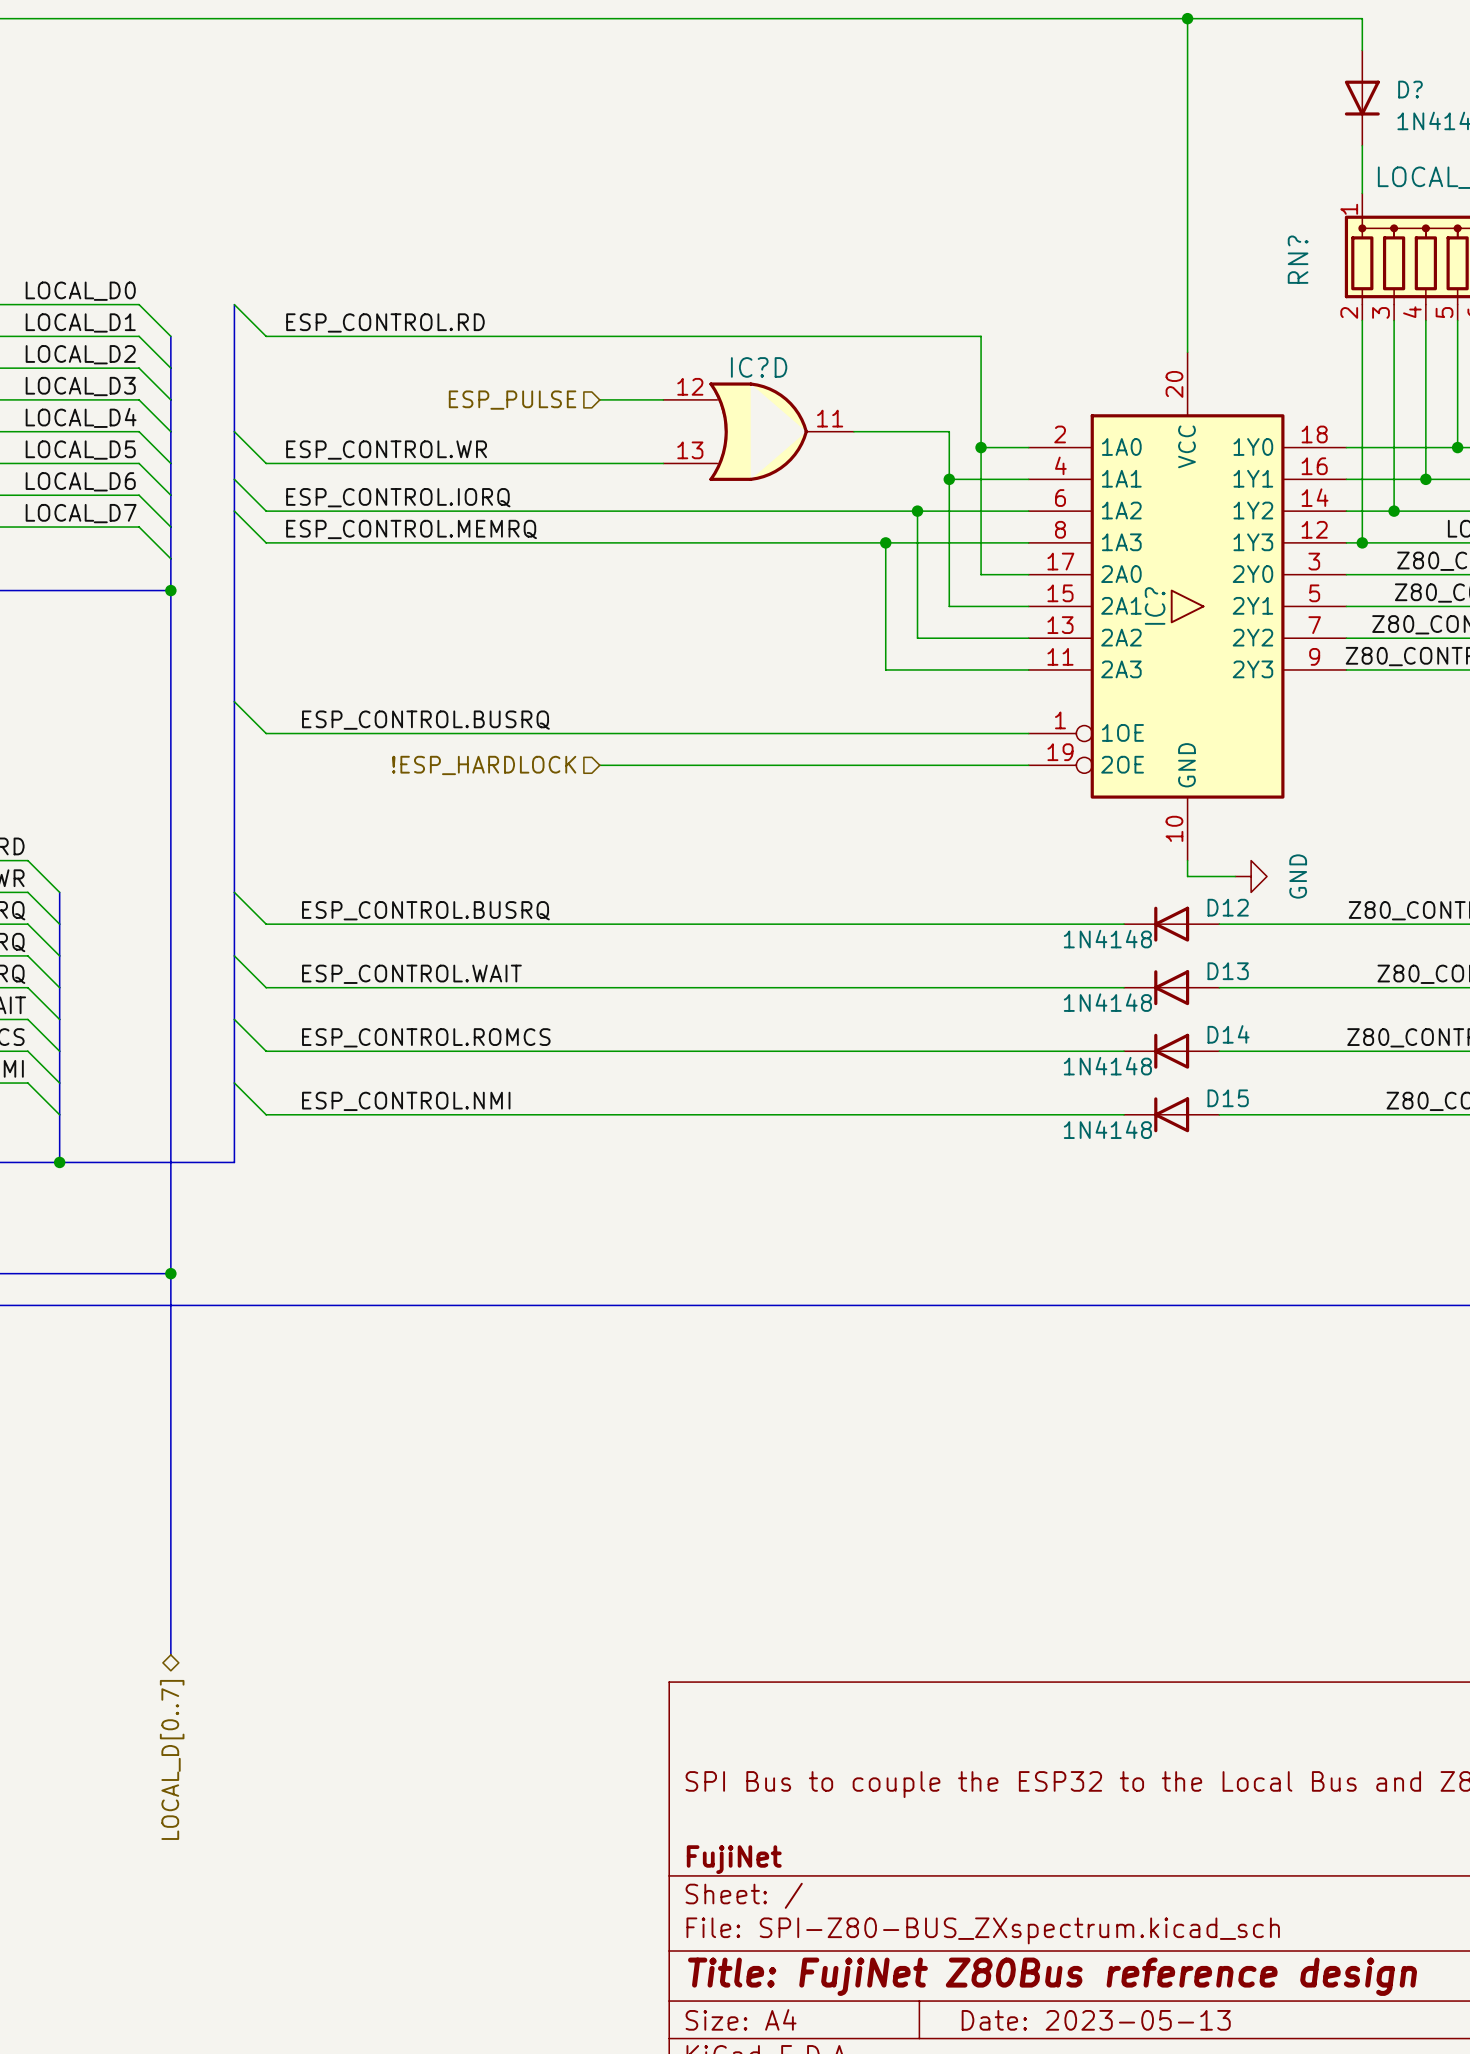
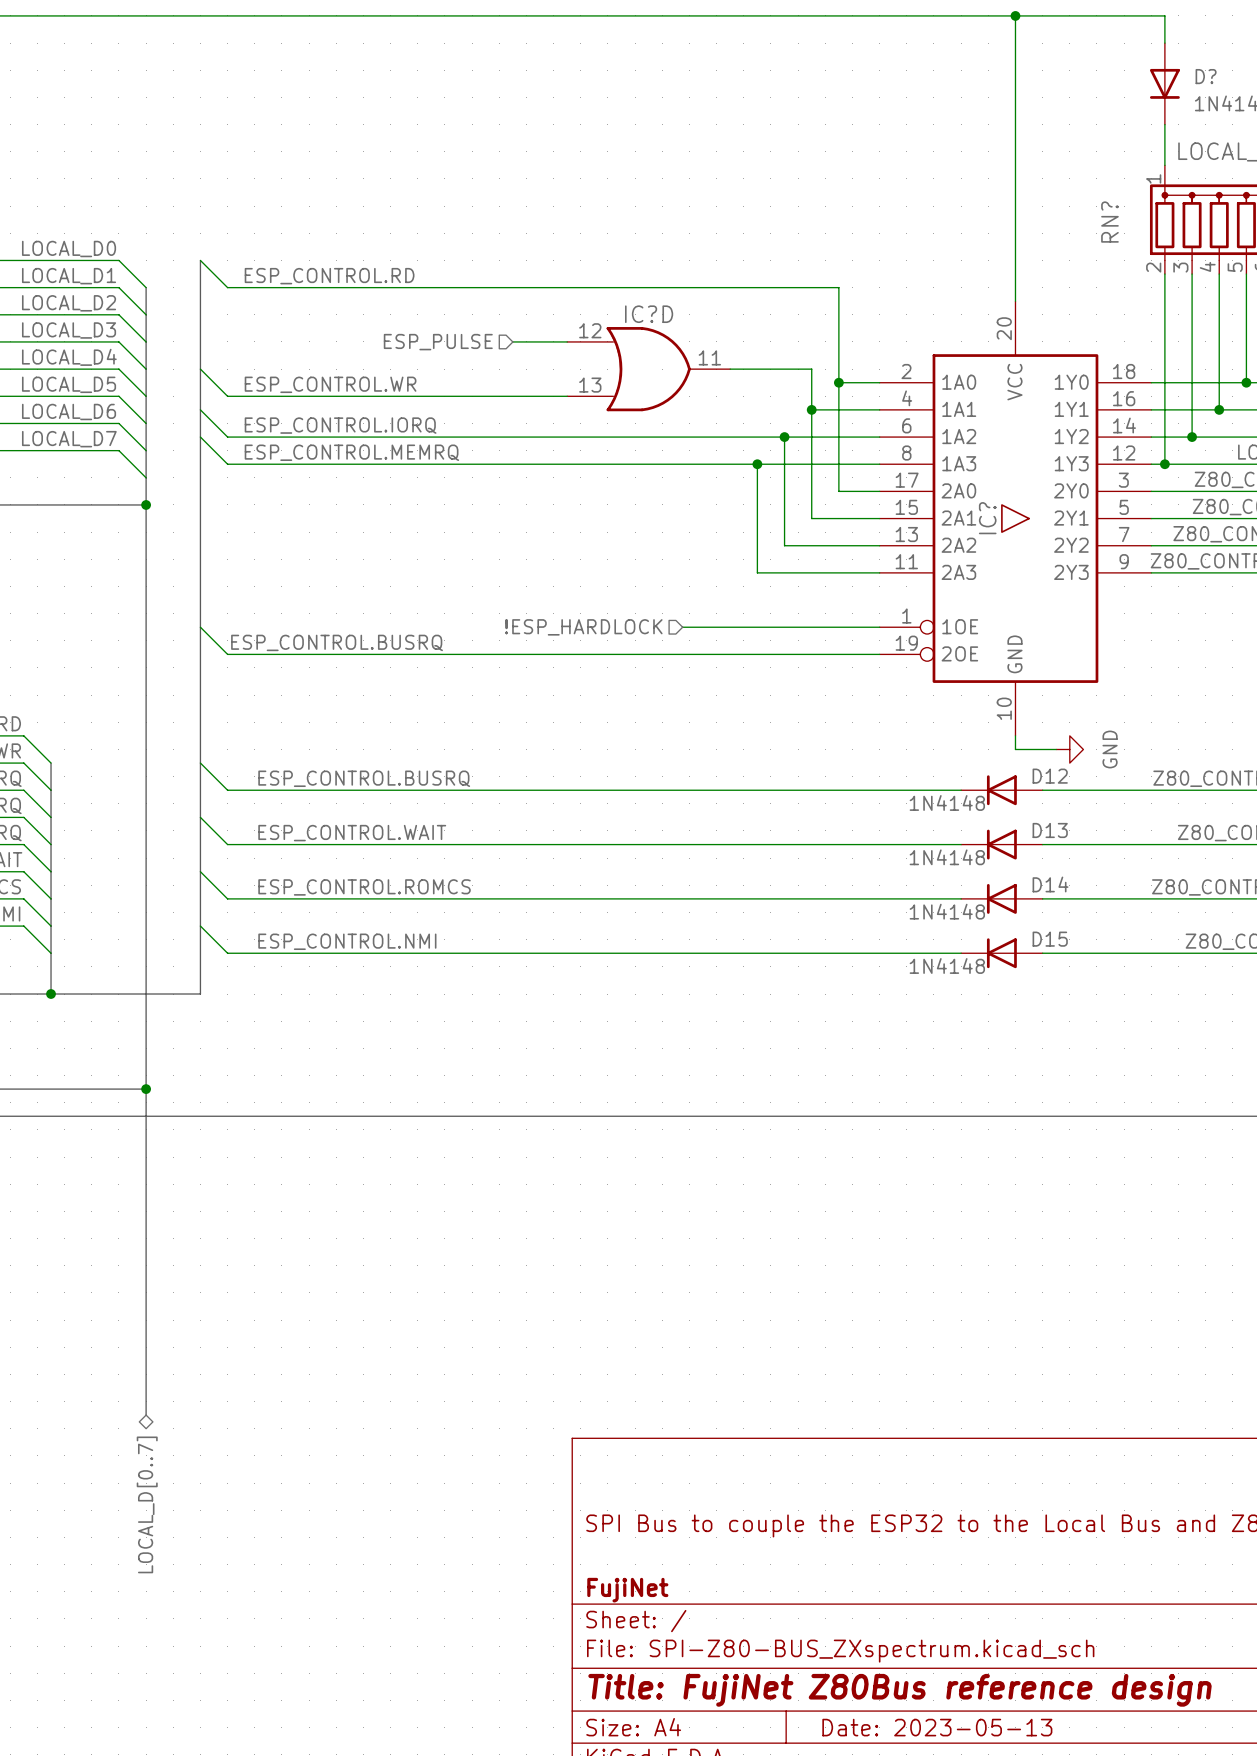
wire: (234, 701) (266, 733) (798, 733) -> none
label position: ESP_CONTROL.BUSRQ (425, 720) -> ESP_CONTROL.BUSRQ (337, 642)
wire: none -> (200, 627) (227, 654) (512, 654)
hierarchical label position: !ESP_HARDLOCK (484, 765) -> !ESP_HARDLOCK (583, 627)

